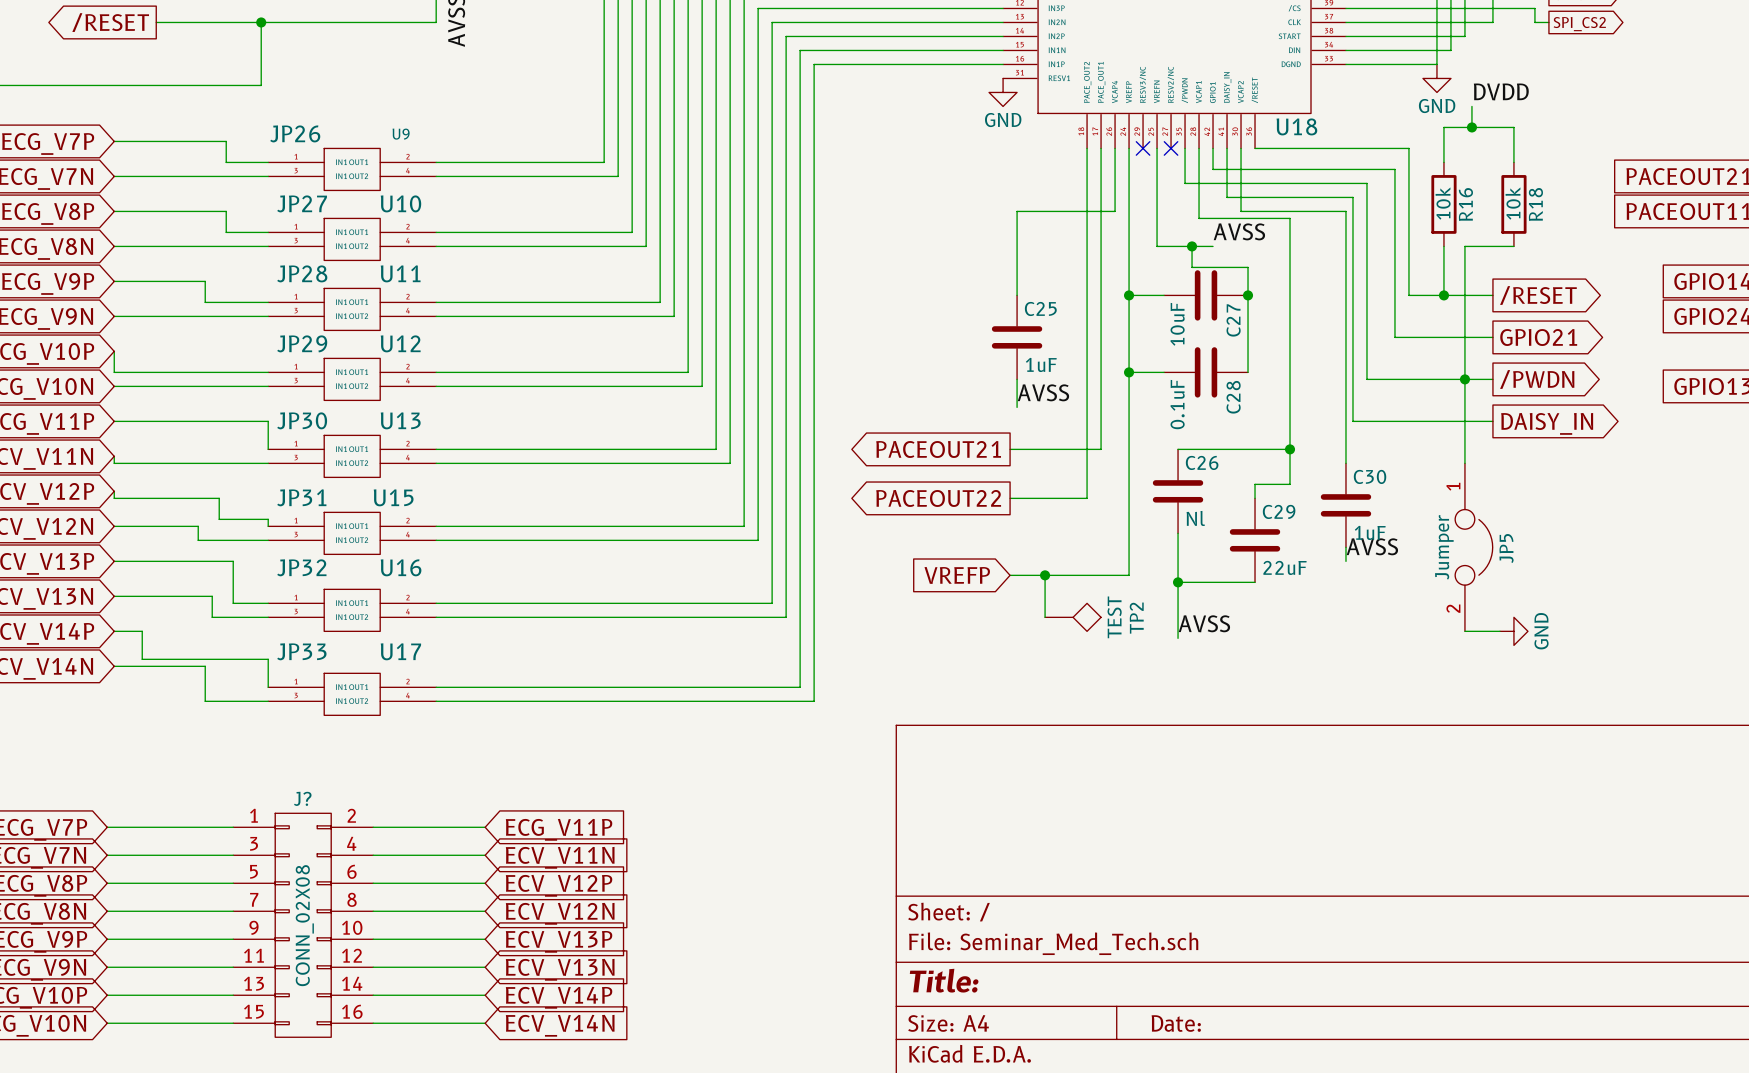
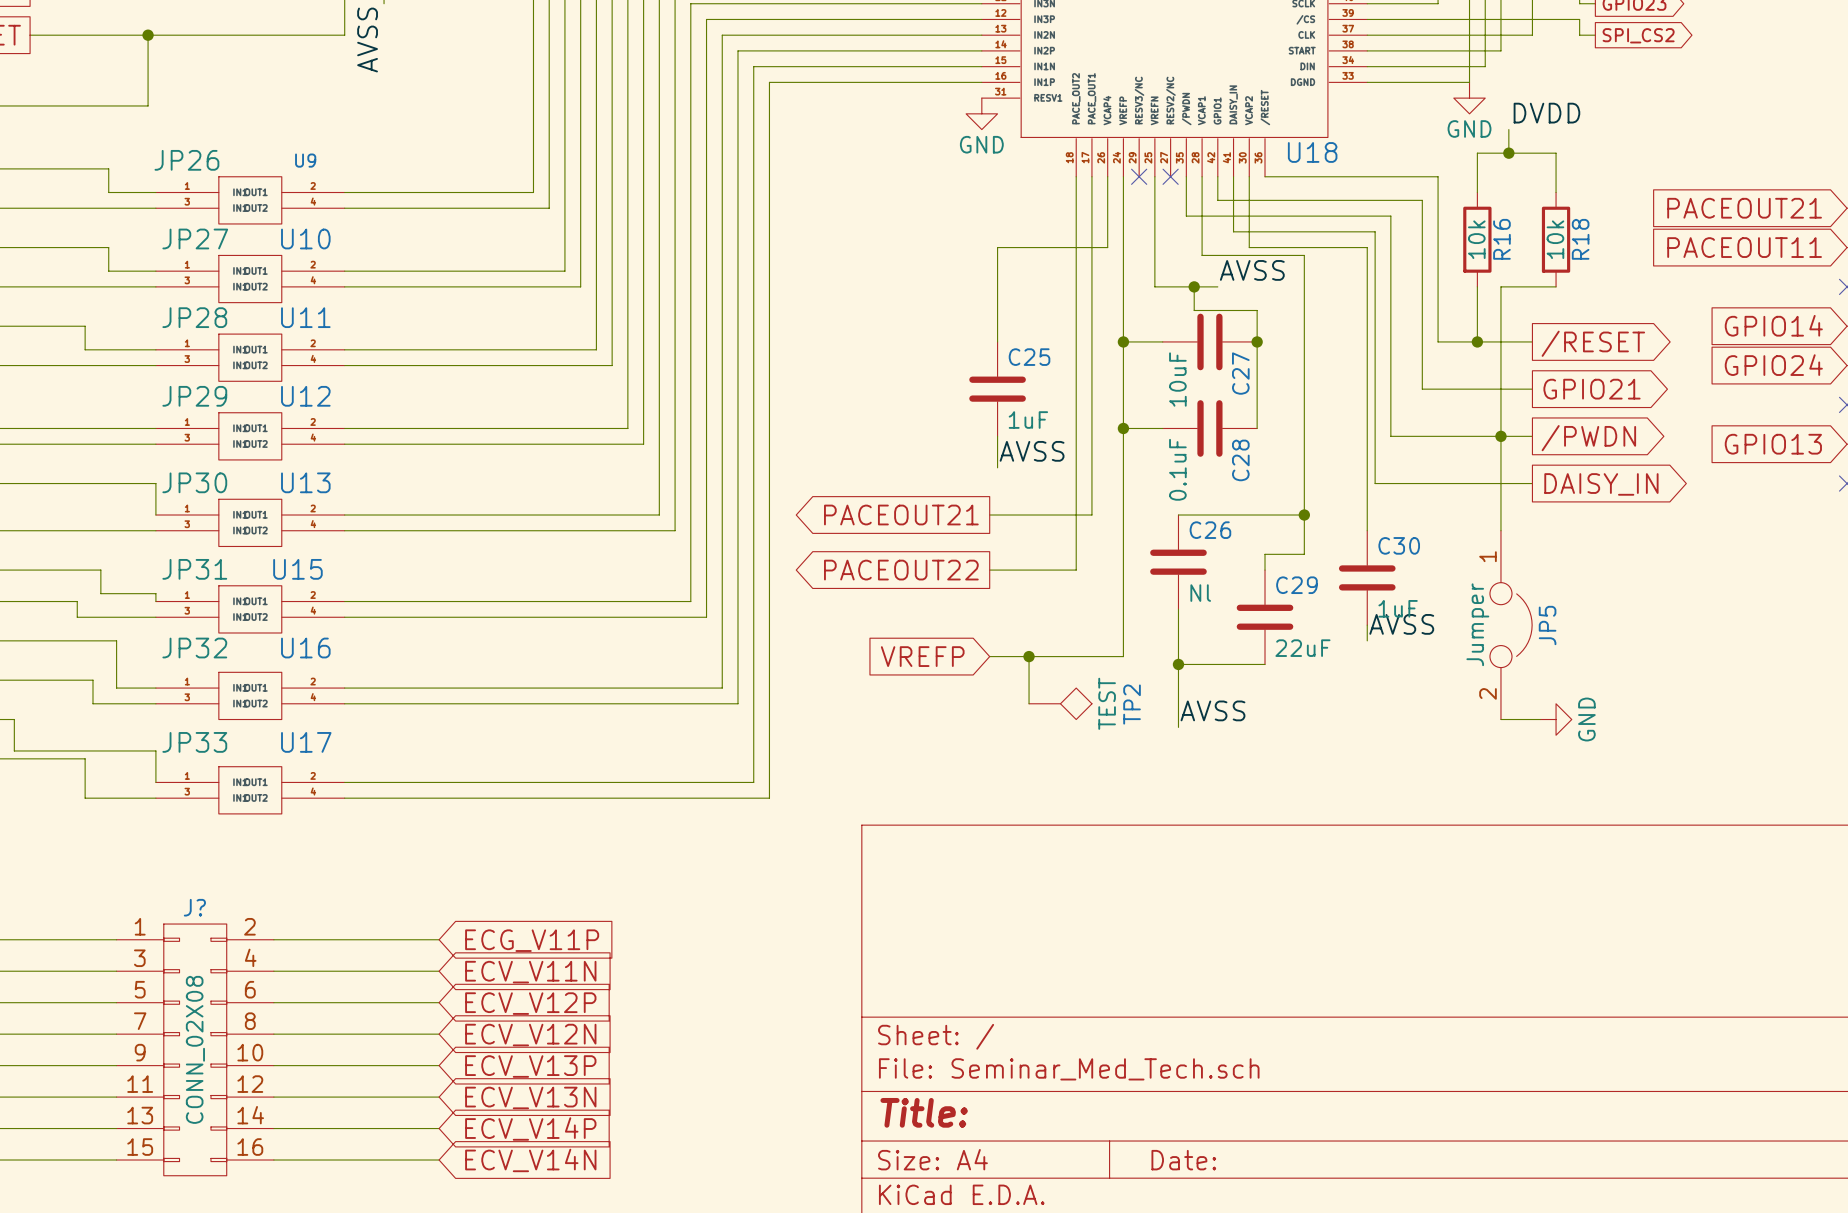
wire: none -> (399, 939) (439, 939)
global label position: ECG_V11P (559, 829) -> ECG_V11P (532, 940)
wire: none -> (399, 971) (439, 971)
global label position: ECV_V11N (560, 857) -> ECV_V11N (530, 972)
wire: none -> (399, 1002) (439, 1002)
global label position: ECV_V12P (559, 885) -> ECV_V12P (530, 1003)
wire: none -> (399, 1034) (439, 1034)
global label position: ECV_V12N (560, 913) -> ECV_V12N (530, 1035)
wire: none -> (399, 1065) (439, 1065)
global label position: ECV_V13P (559, 941) -> ECV_V13P (530, 1066)
wire: none -> (399, 1097) (439, 1097)
global label position: ECV_V13N (560, 969) -> ECV_V13N (530, 1097)
wire: none -> (399, 1128) (439, 1128)
global label position: ECV_V14P (559, 997) -> ECV_V14P (530, 1128)
wire: none -> (399, 1160) (439, 1160)
global label position: ECV_V14N (560, 1025) -> ECV_V14N (530, 1160)

